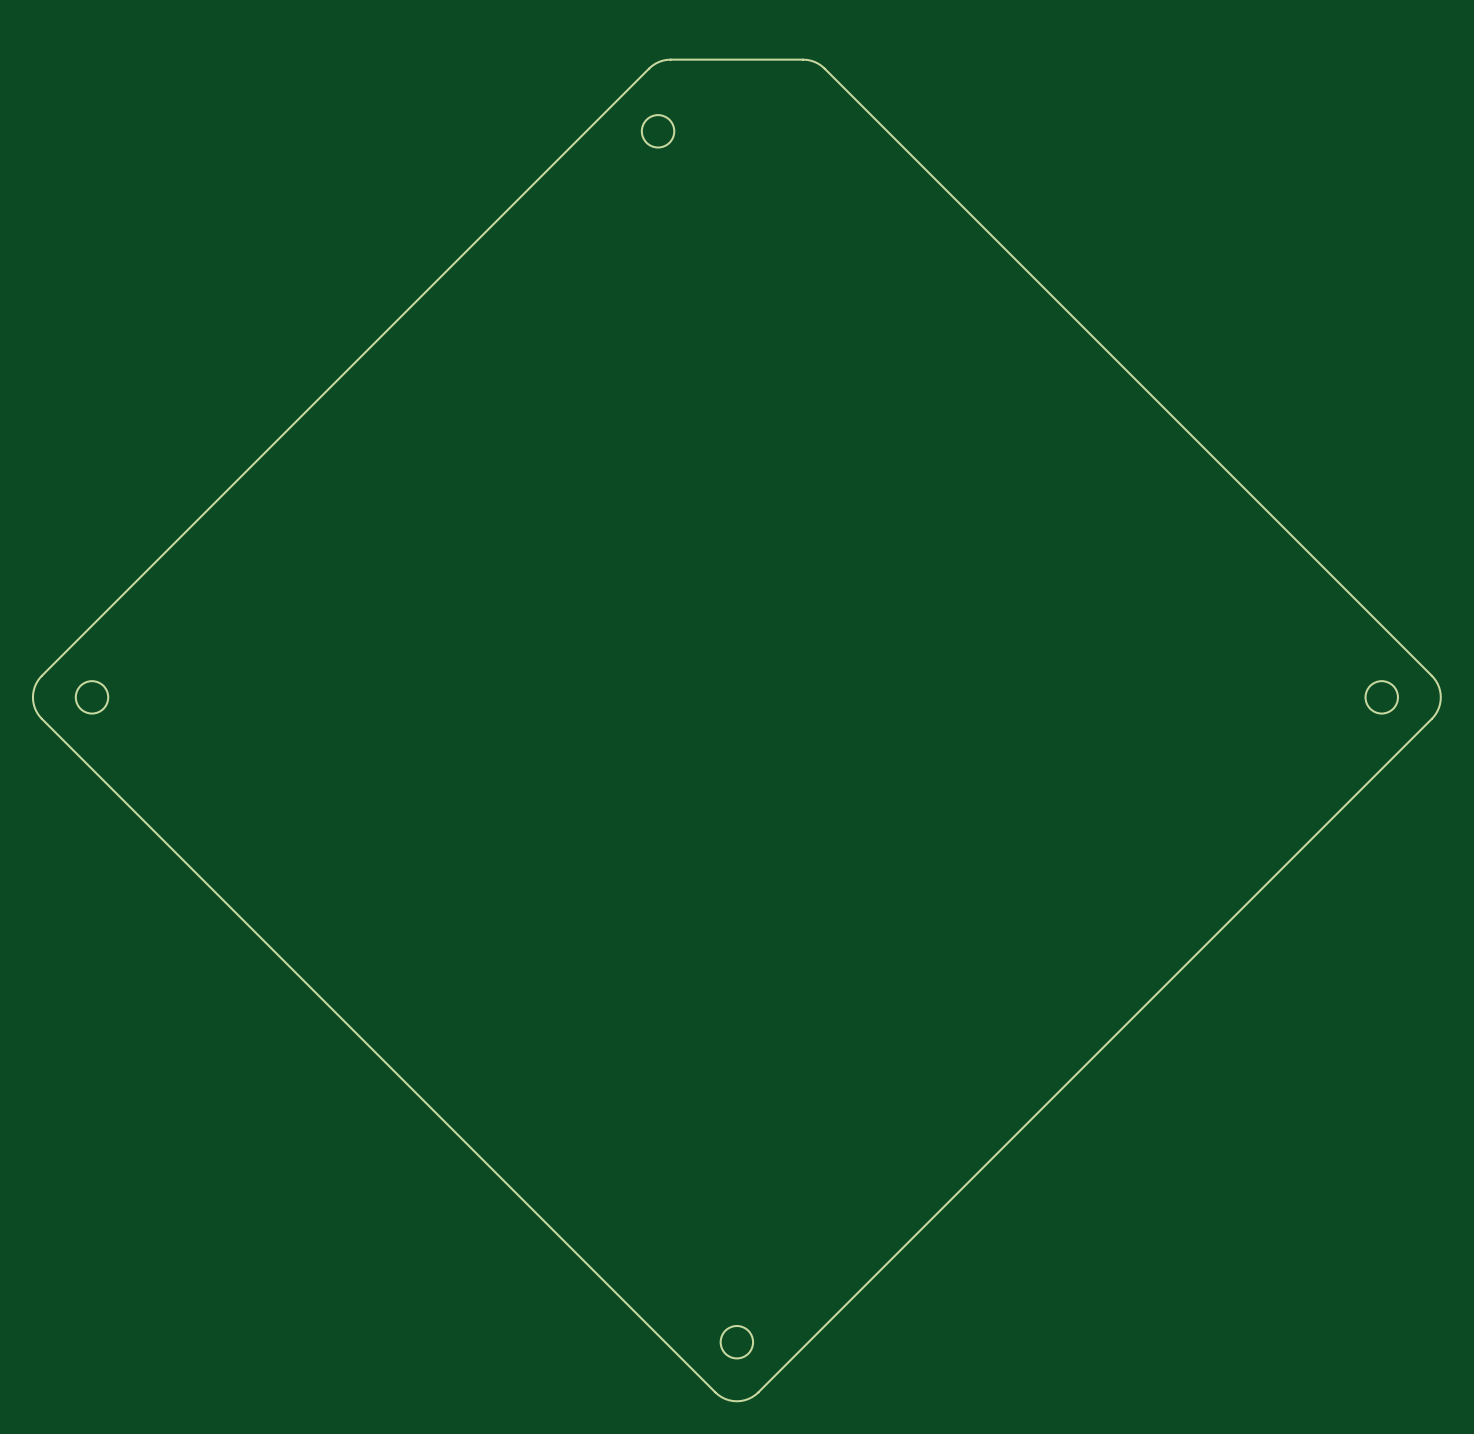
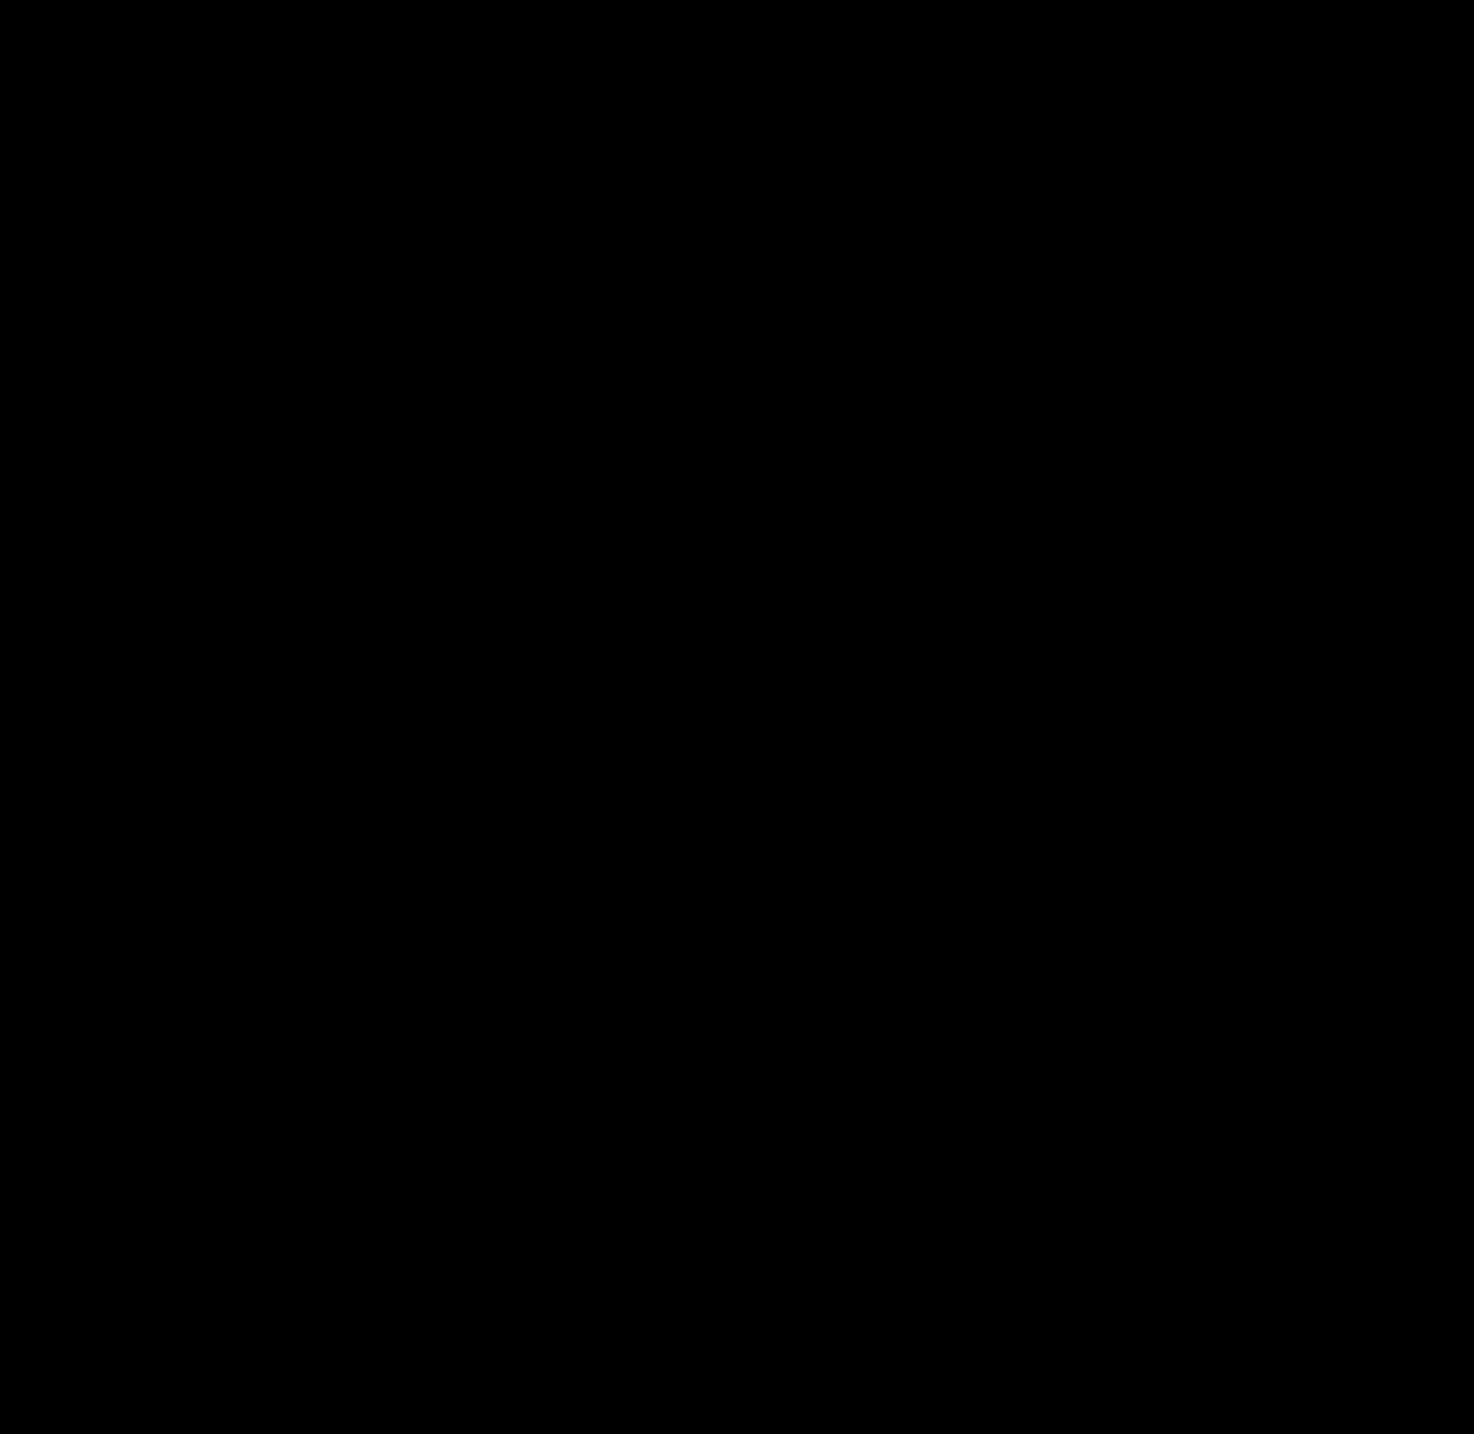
board edge: (803, 59) (670, 59) (662, 60) (652, 65) (41, 675) (34, 687) (32, 697) (35, 710) (41, 718) (715, 1392) (725, 1398) (736, 1401) (748, 1398) (758, 1392) (1431, 718) (1439, 707) (1440, 697) (1437, 684) (1431, 675) (824, 68) (814, 61) (803, 59) -> none
round board edge: [640, 114, 676, 149] -> none
round board edge: [74, 680, 110, 715] -> none
round board edge: [1364, 680, 1399, 715] -> none
round board edge: [719, 1324, 755, 1360] -> none

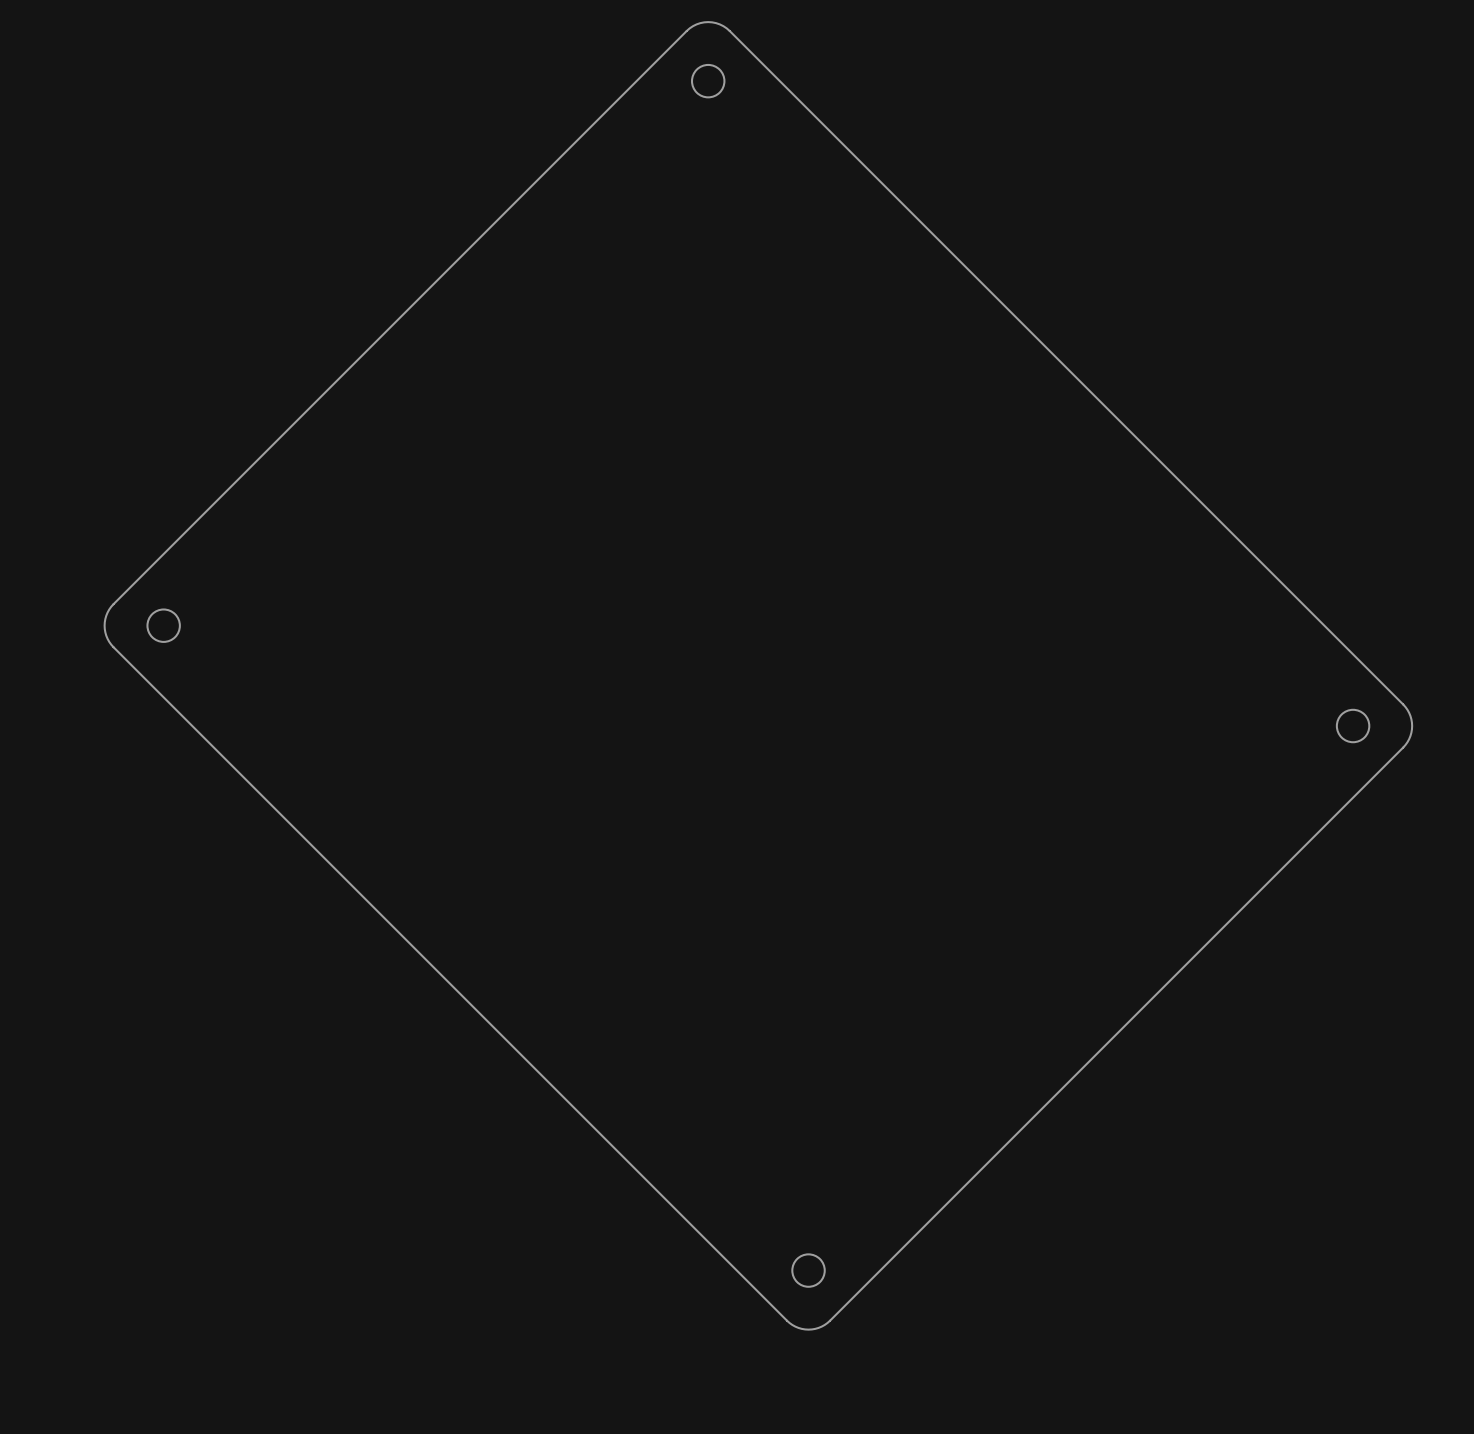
board edge: none -> (729, 30) (1403, 704) (1409, 712) (1411, 722) (1410, 736) (1403, 747) (830, 1320) (821, 1326) (811, 1329) (798, 1327) (787, 1320) (113, 647) (107, 638) (104, 629) (106, 615) (113, 604) (686, 30) (696, 24) (708, 22) (719, 24) (729, 30)
round board edge: none -> [690, 63, 726, 99]
round board edge: none -> [146, 608, 181, 643]
round board edge: none -> [1335, 708, 1371, 744]
round board edge: none -> [791, 1253, 826, 1288]

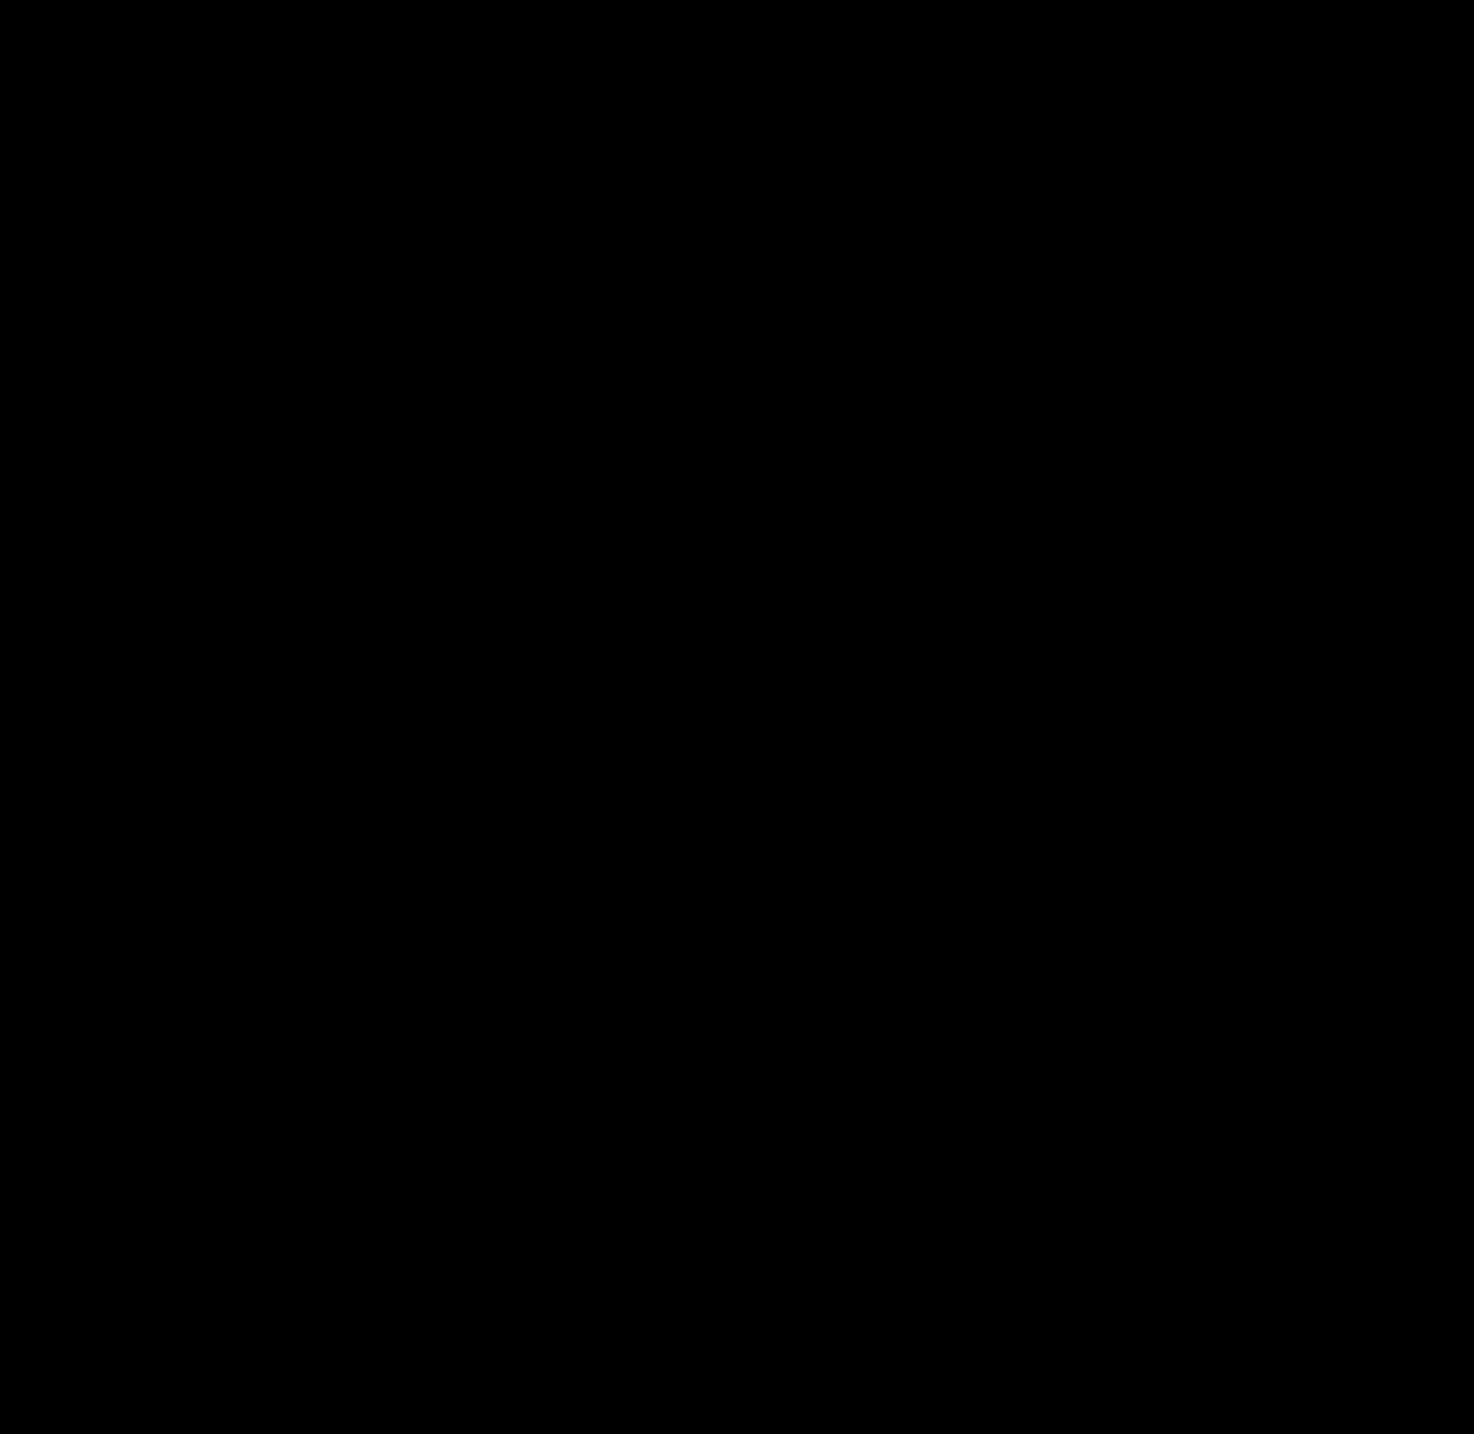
board edge: (729, 30) (1403, 704) (1409, 712) (1411, 722) (1410, 736) (1403, 747) (830, 1320) (821, 1326) (811, 1329) (798, 1327) (787, 1320) (113, 647) (107, 638) (104, 629) (106, 615) (113, 604) (686, 30) (696, 24) (708, 22) (719, 24) (729, 30) -> none
round board edge: [690, 63, 726, 99] -> none
round board edge: [146, 608, 181, 643] -> none
round board edge: [1335, 708, 1371, 744] -> none
round board edge: [791, 1253, 826, 1288] -> none

